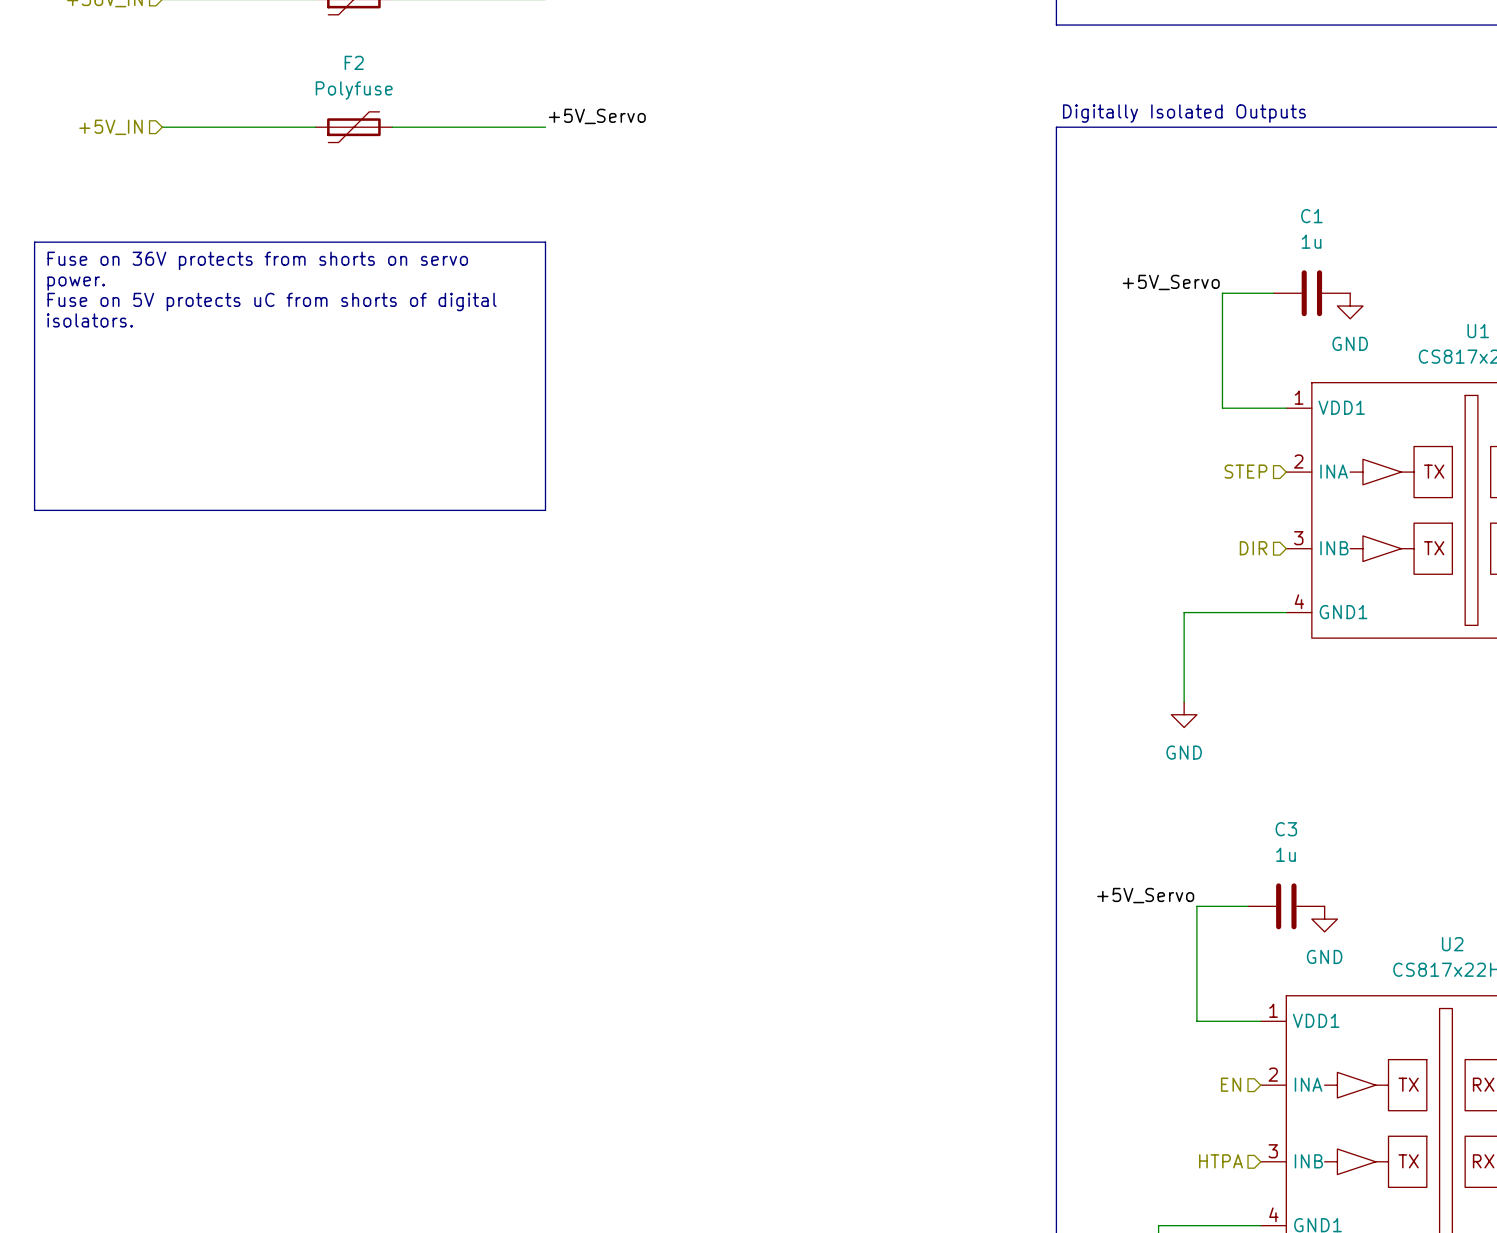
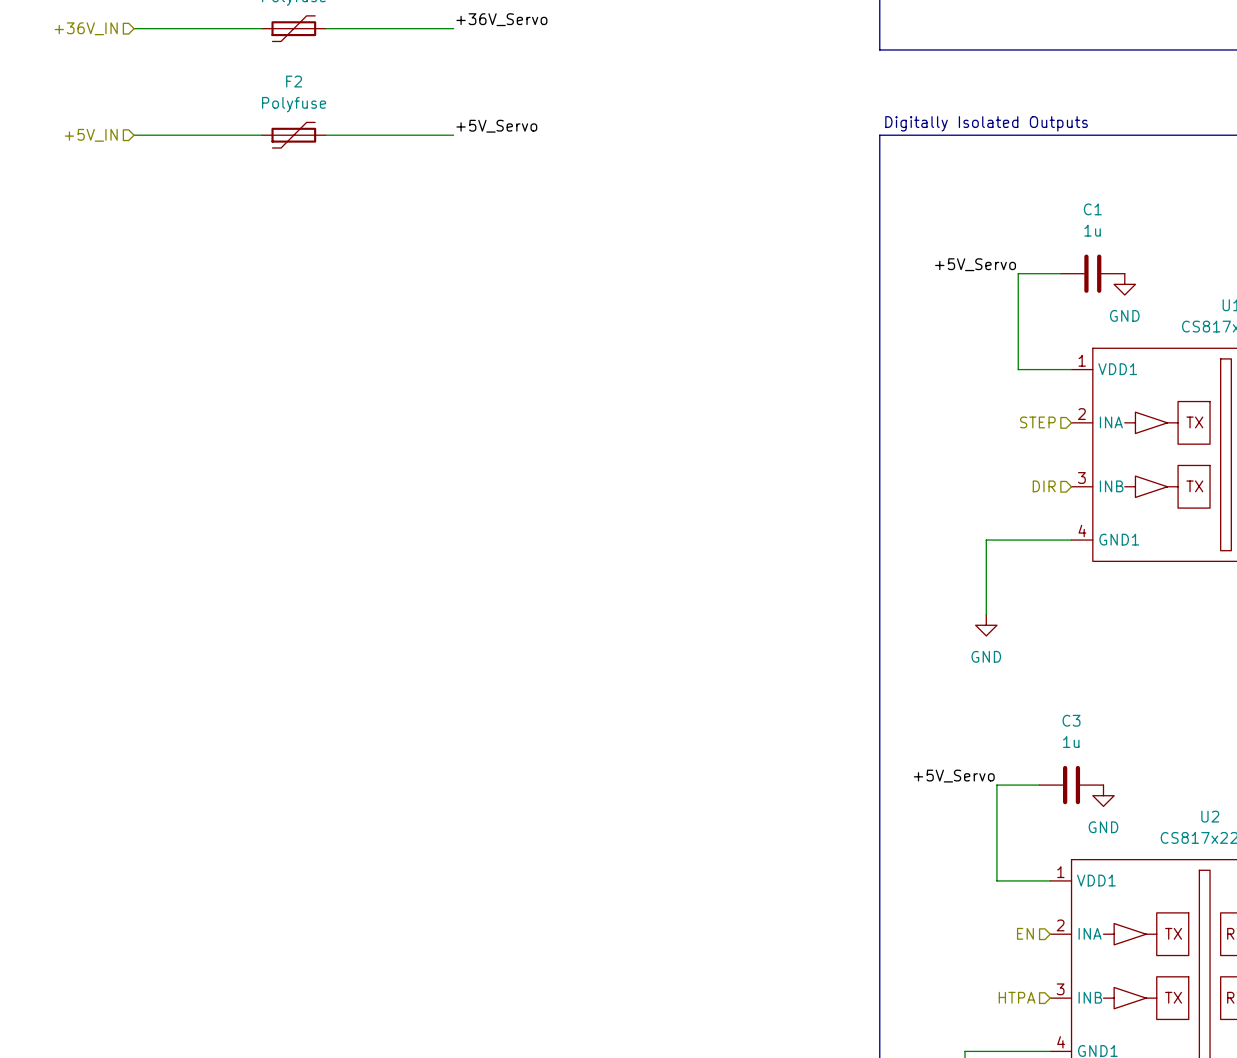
line: (34, 242) (545, 242) (545, 510) (34, 510) (34, 242) -> none
text: Fuse on 36V protects from shorts on servo (257, 260) -> none
text: power. (76, 283) -> none
text: Fuse on 5V protects uC from shorts of digital (272, 301) -> none
text: isolators. (89, 320) -> none

